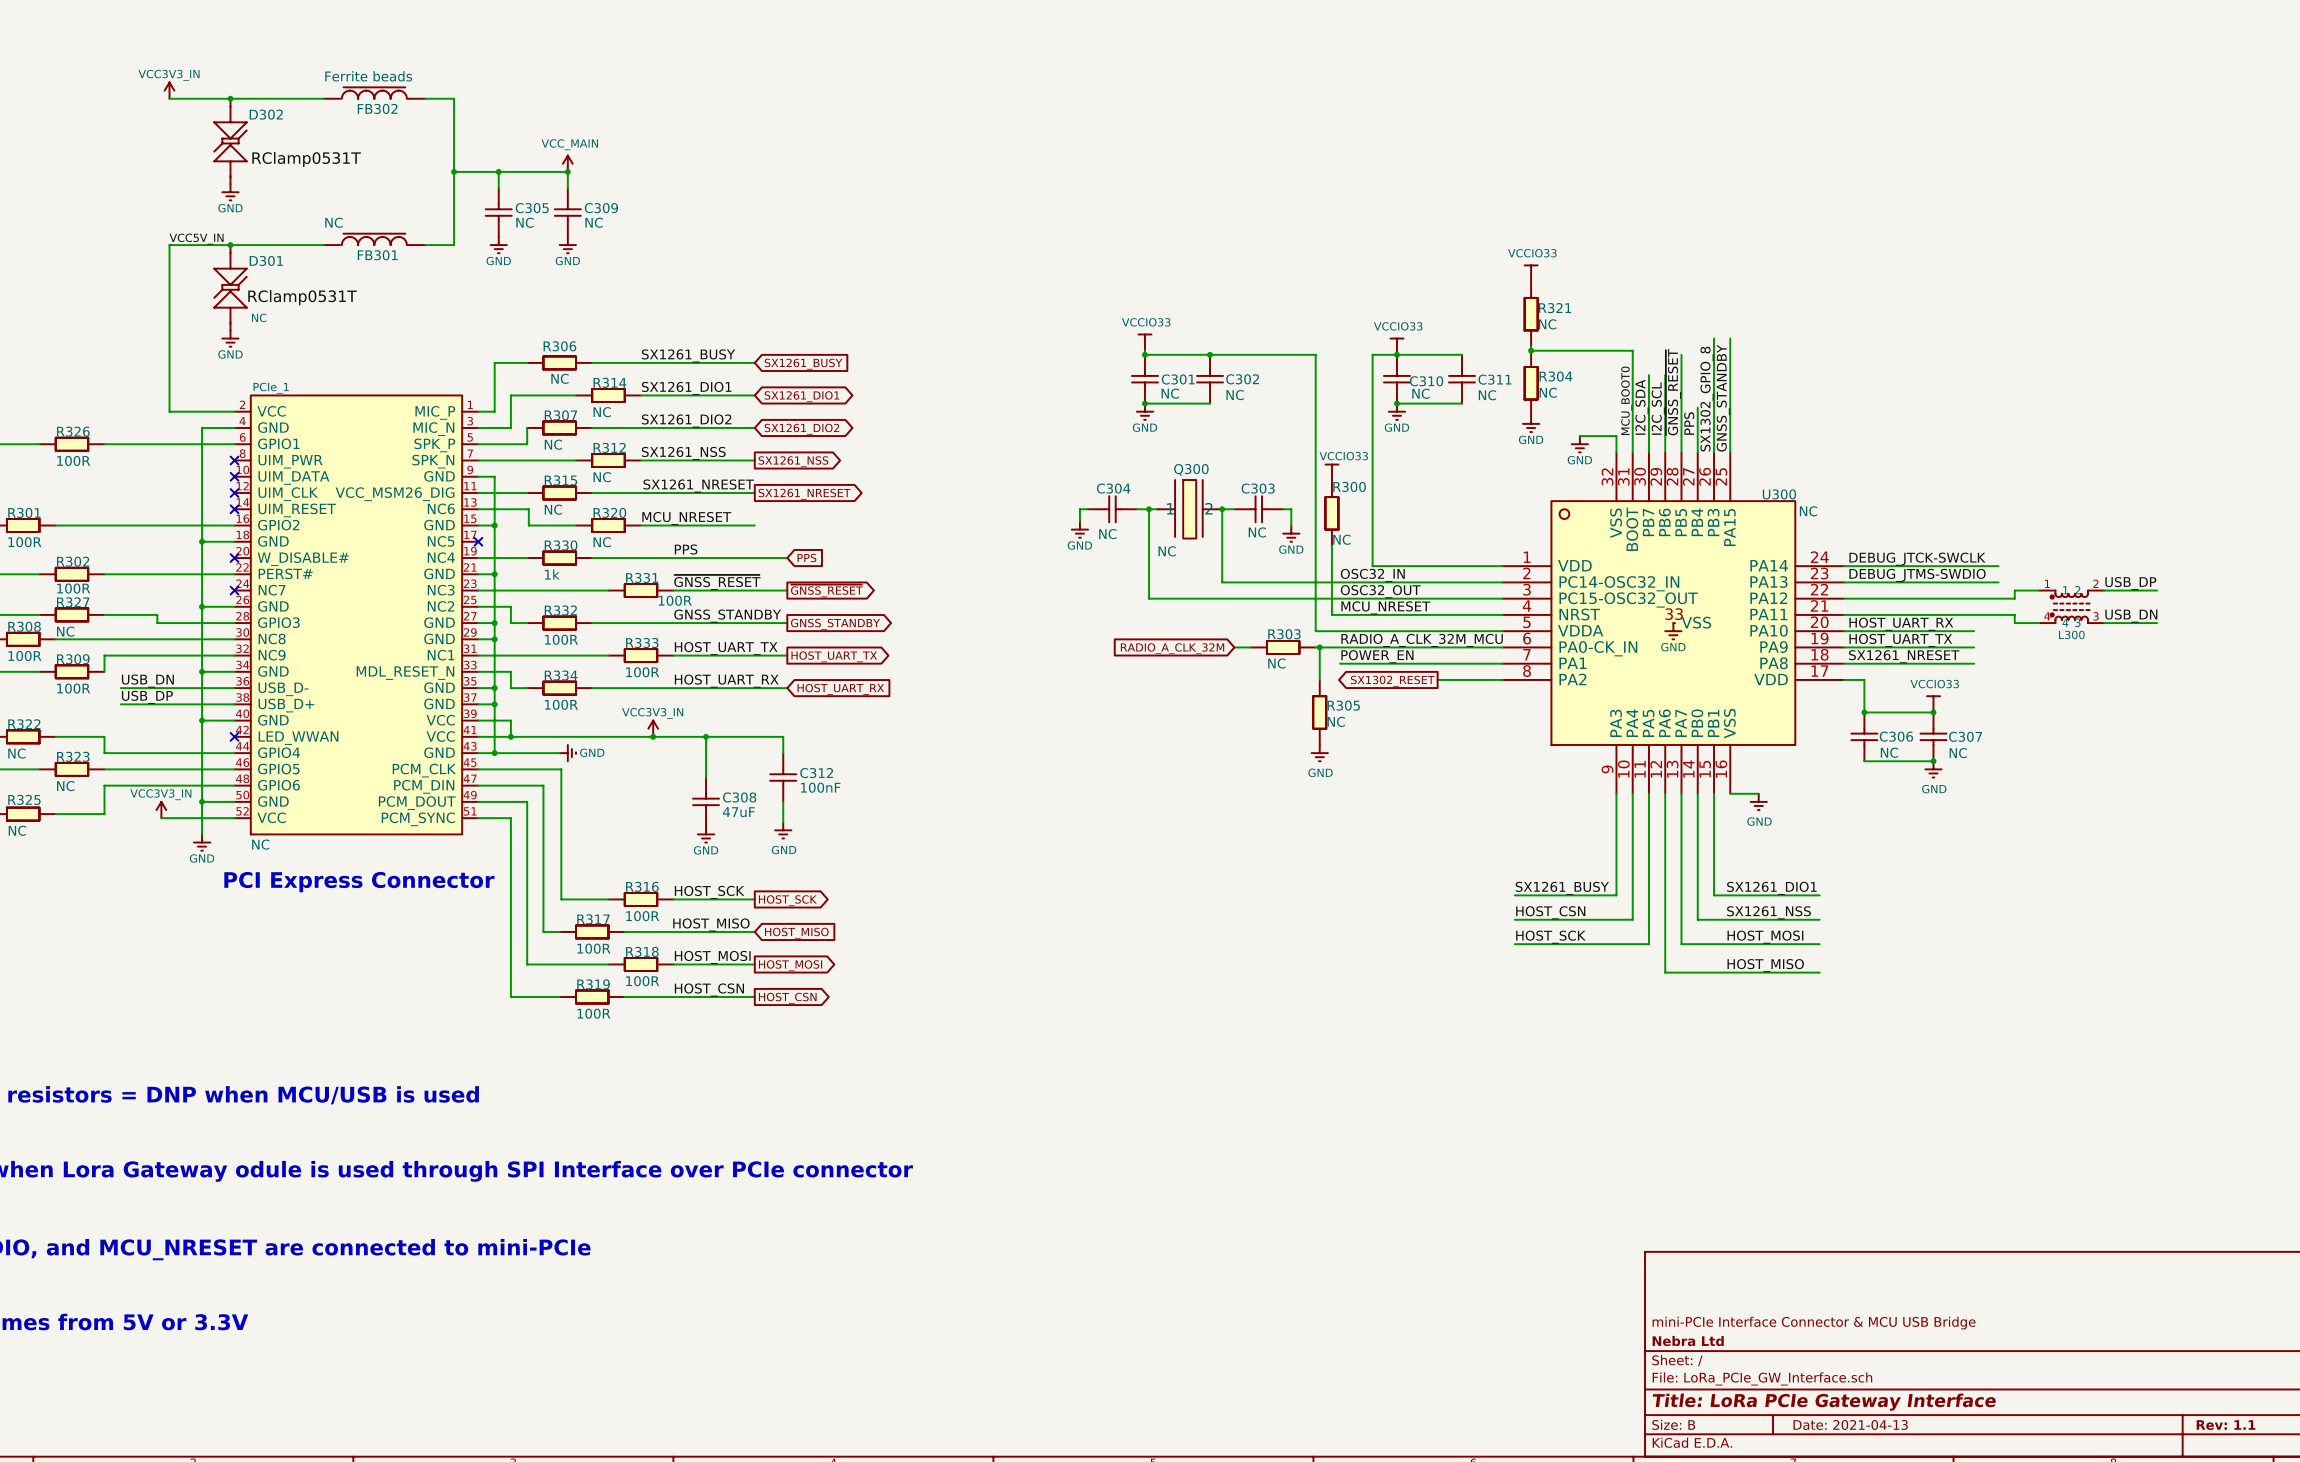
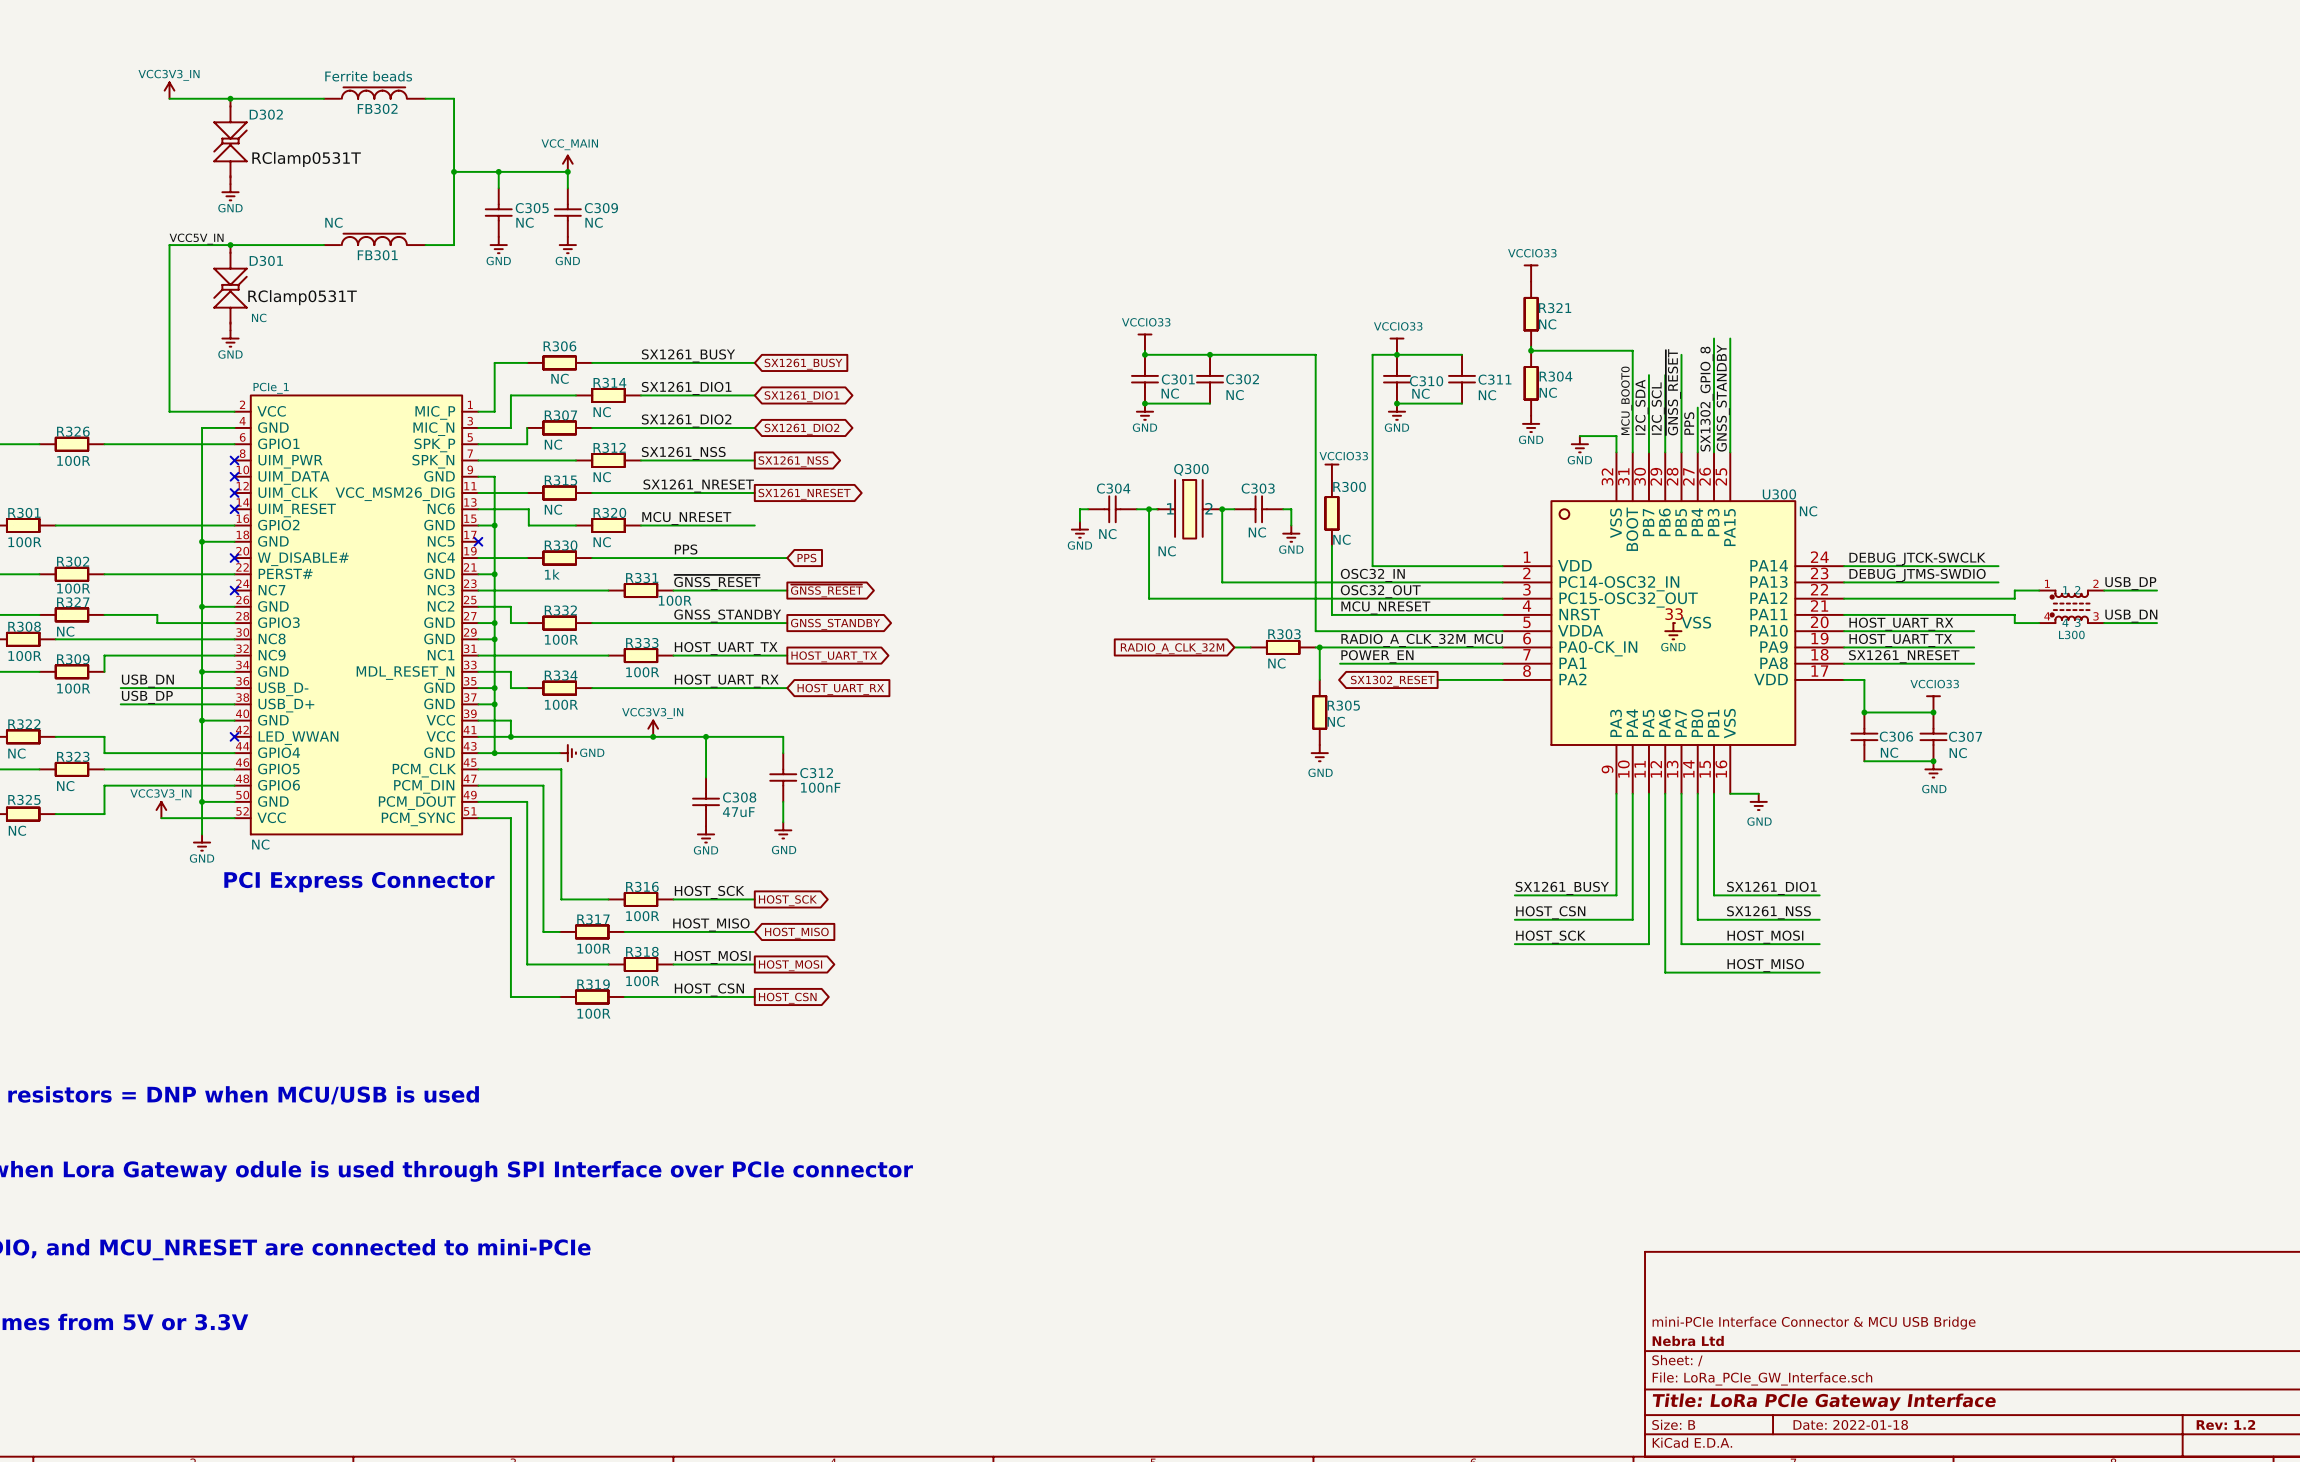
title block: Date: 2021-04-13 (1850, 1424) -> Date: 2022-01-18 (1850, 1424)
title block: Rev: 1.1 (2226, 1425) -> Rev: 1.2 (2225, 1424)

